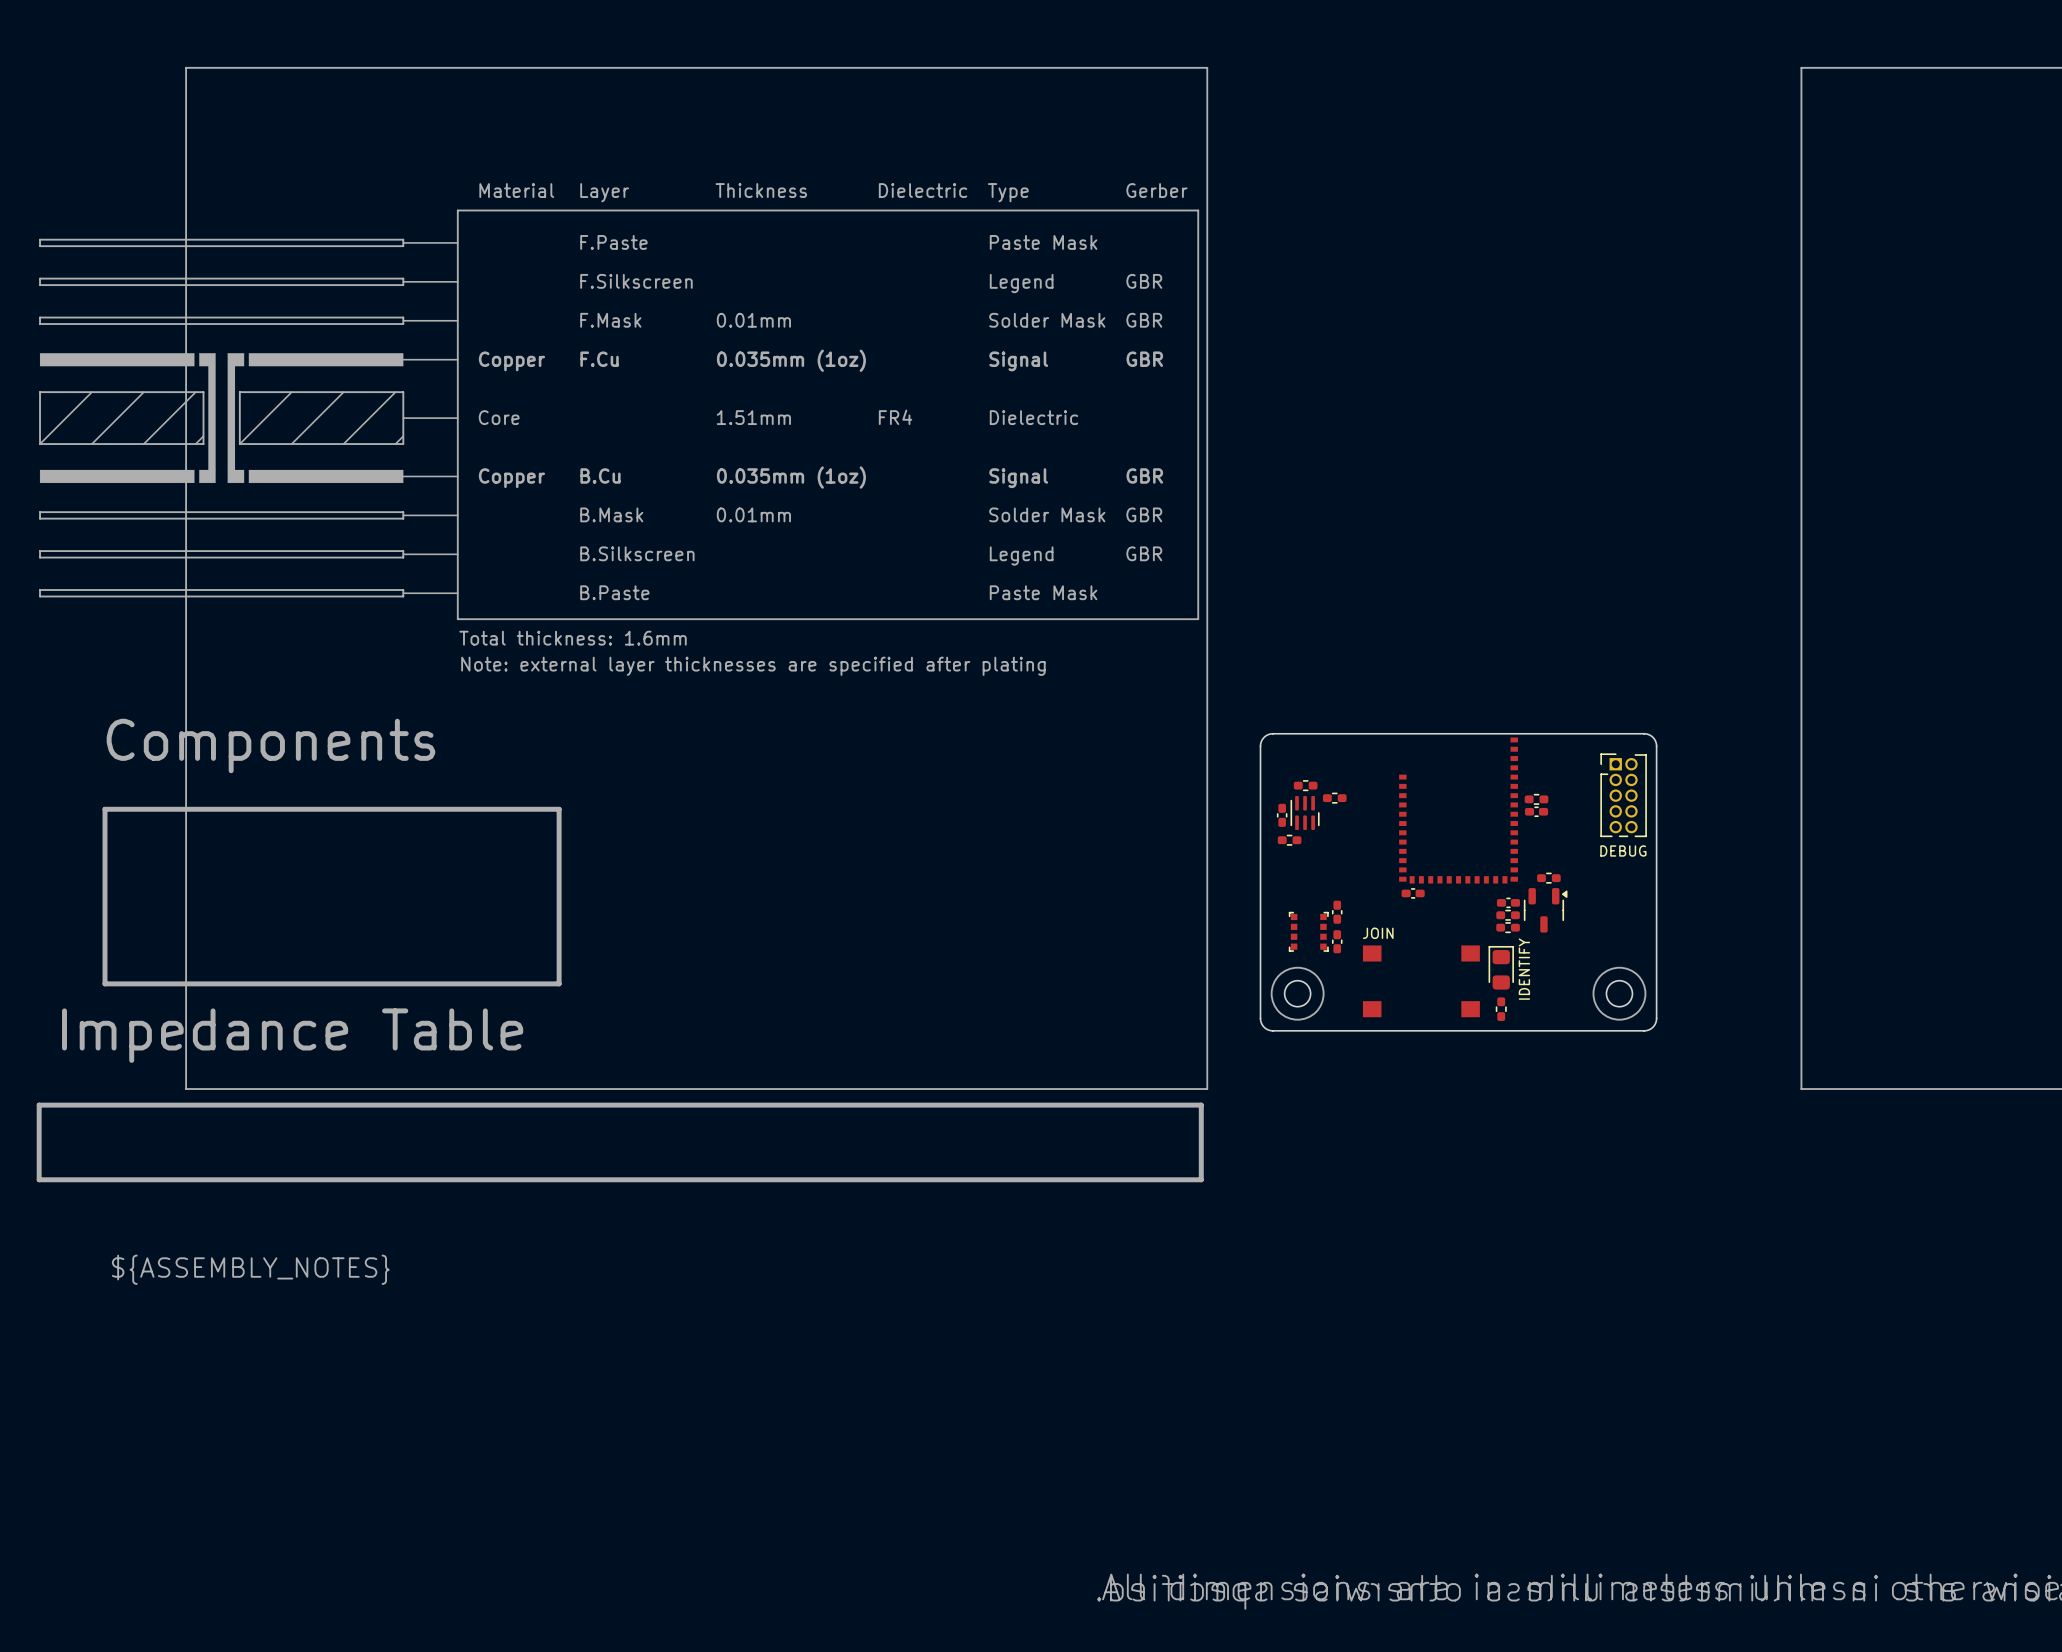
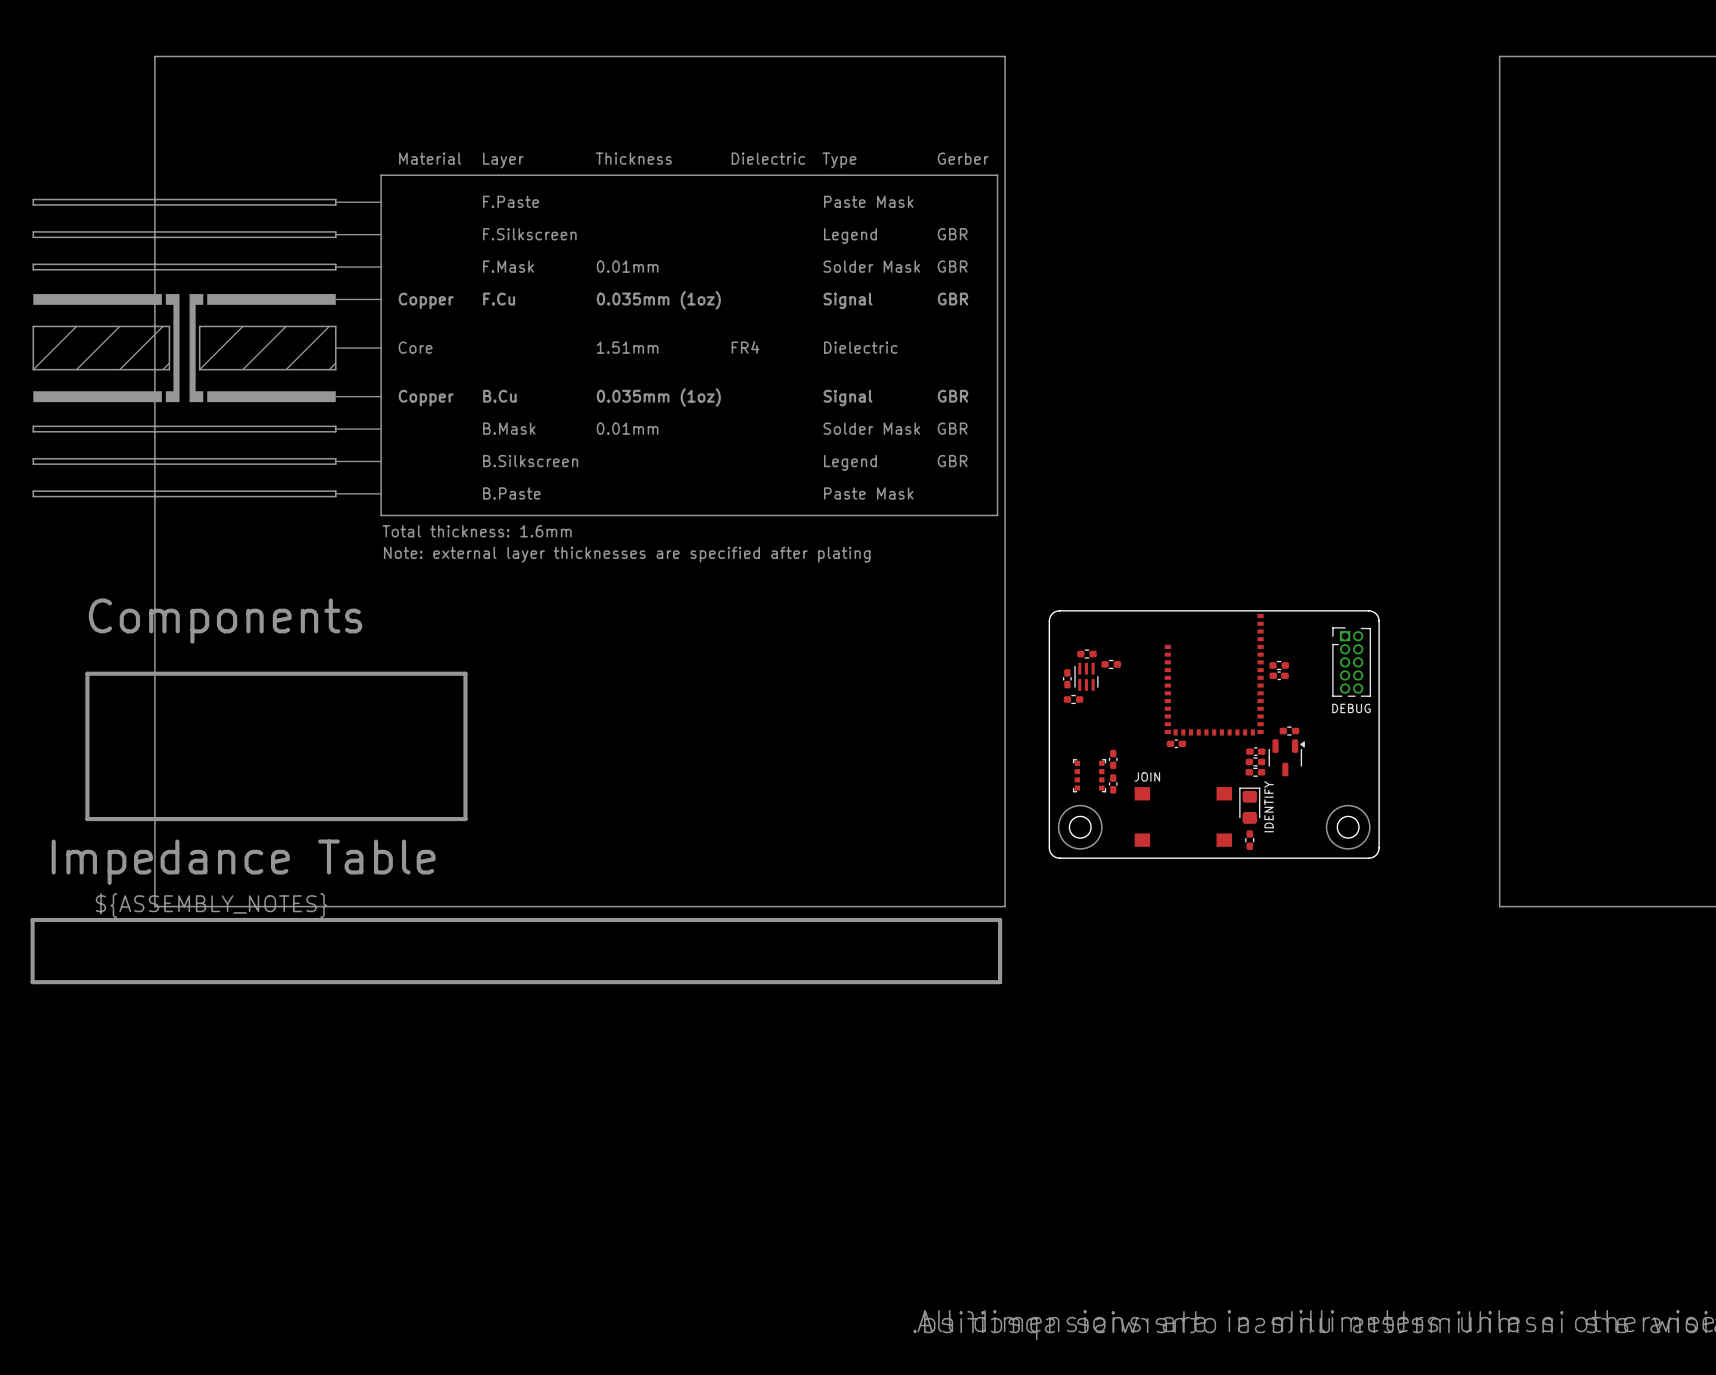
text position: ${ASSEMBLY_NOTES} (250, 1269) -> ${ASSEMBLY_NOTES} (211, 905)

